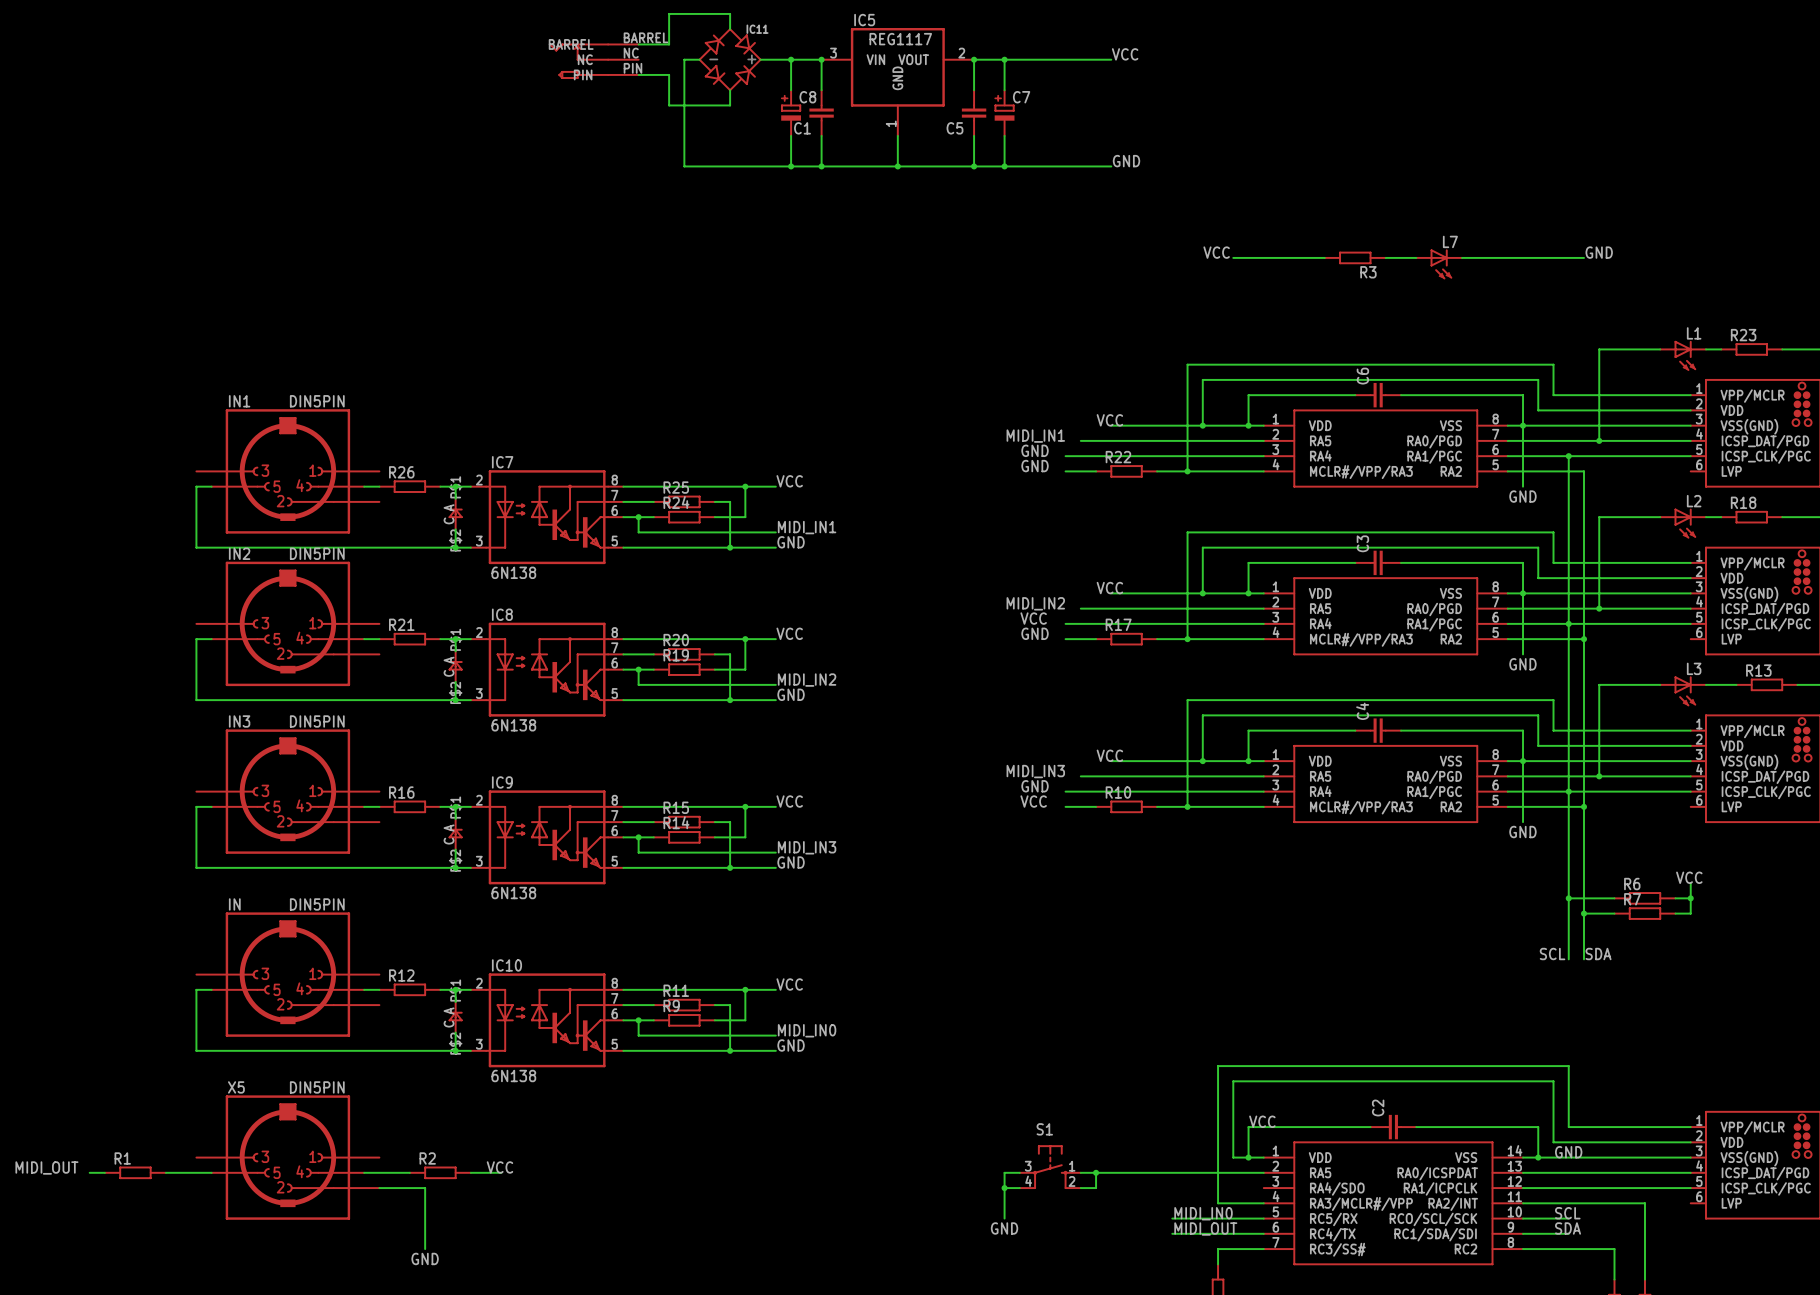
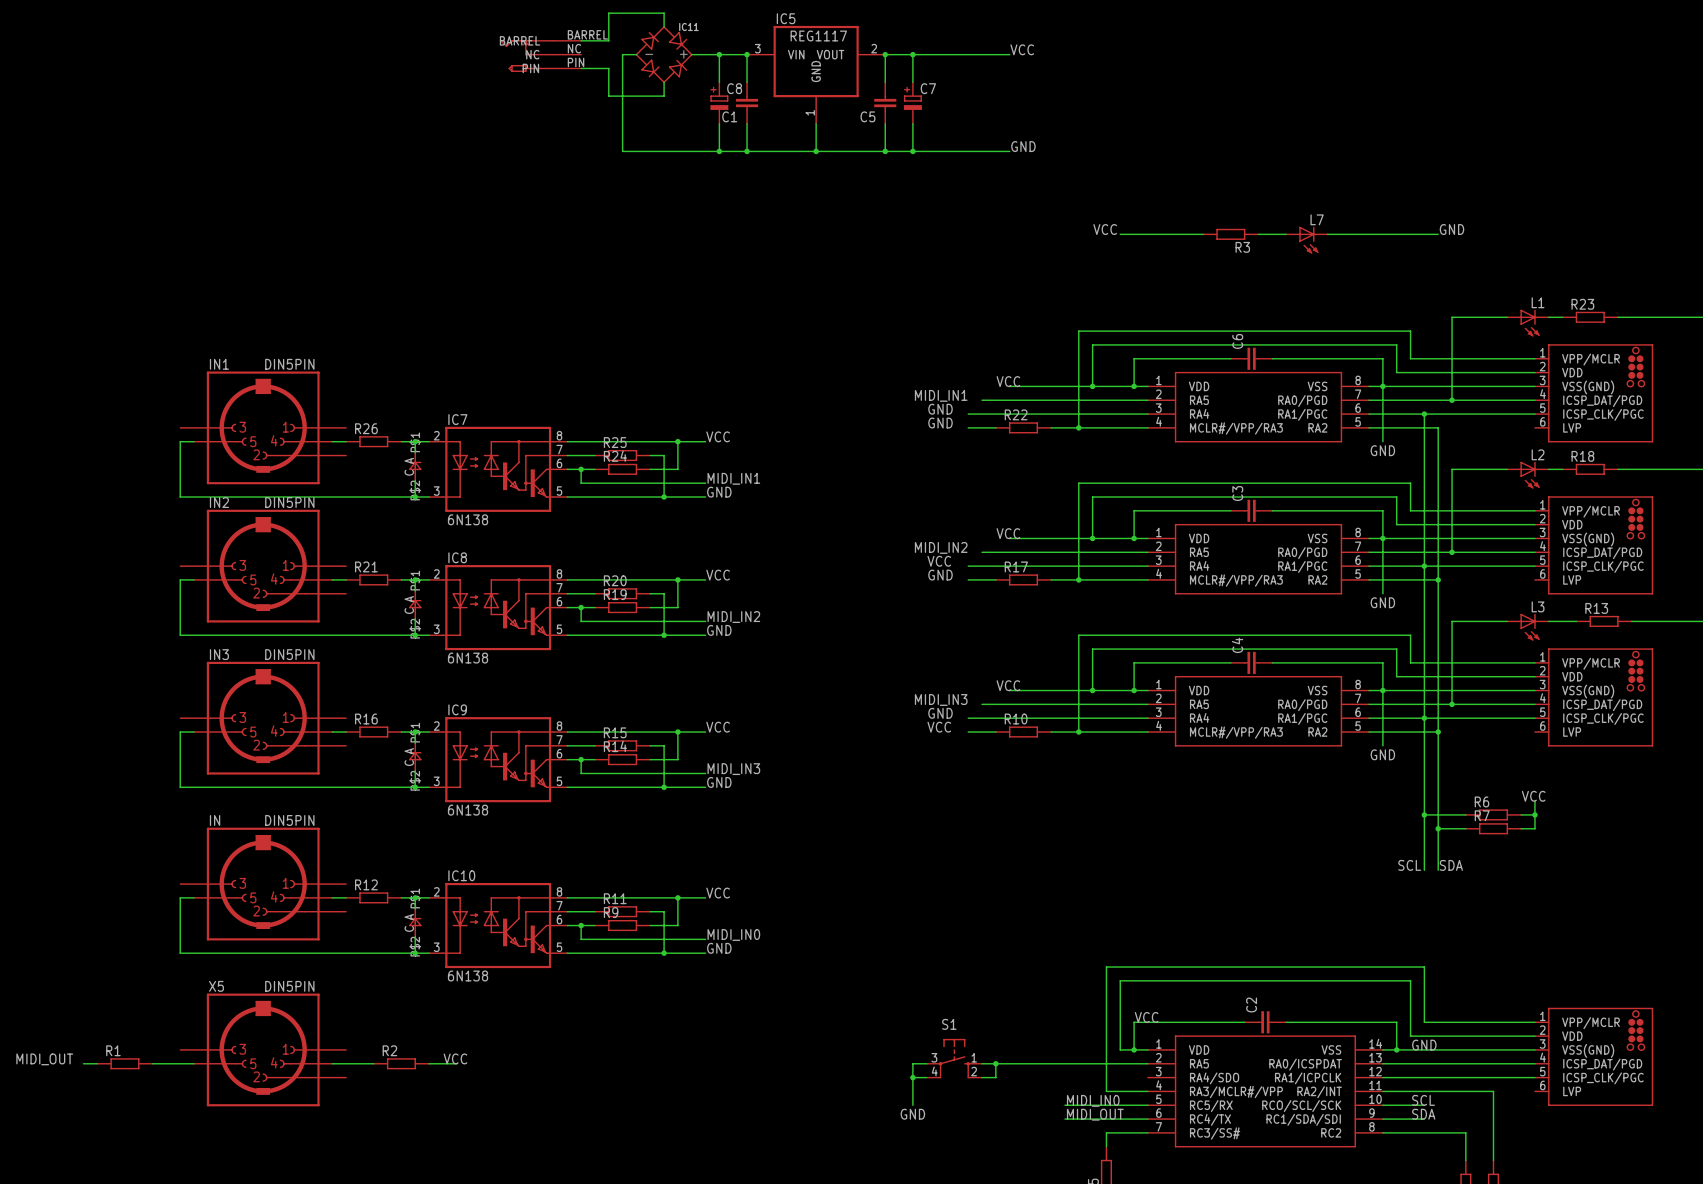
wire: (379, 1188) (425, 1188) (425, 1249) -> none
label: GND (425, 1258) -> none

